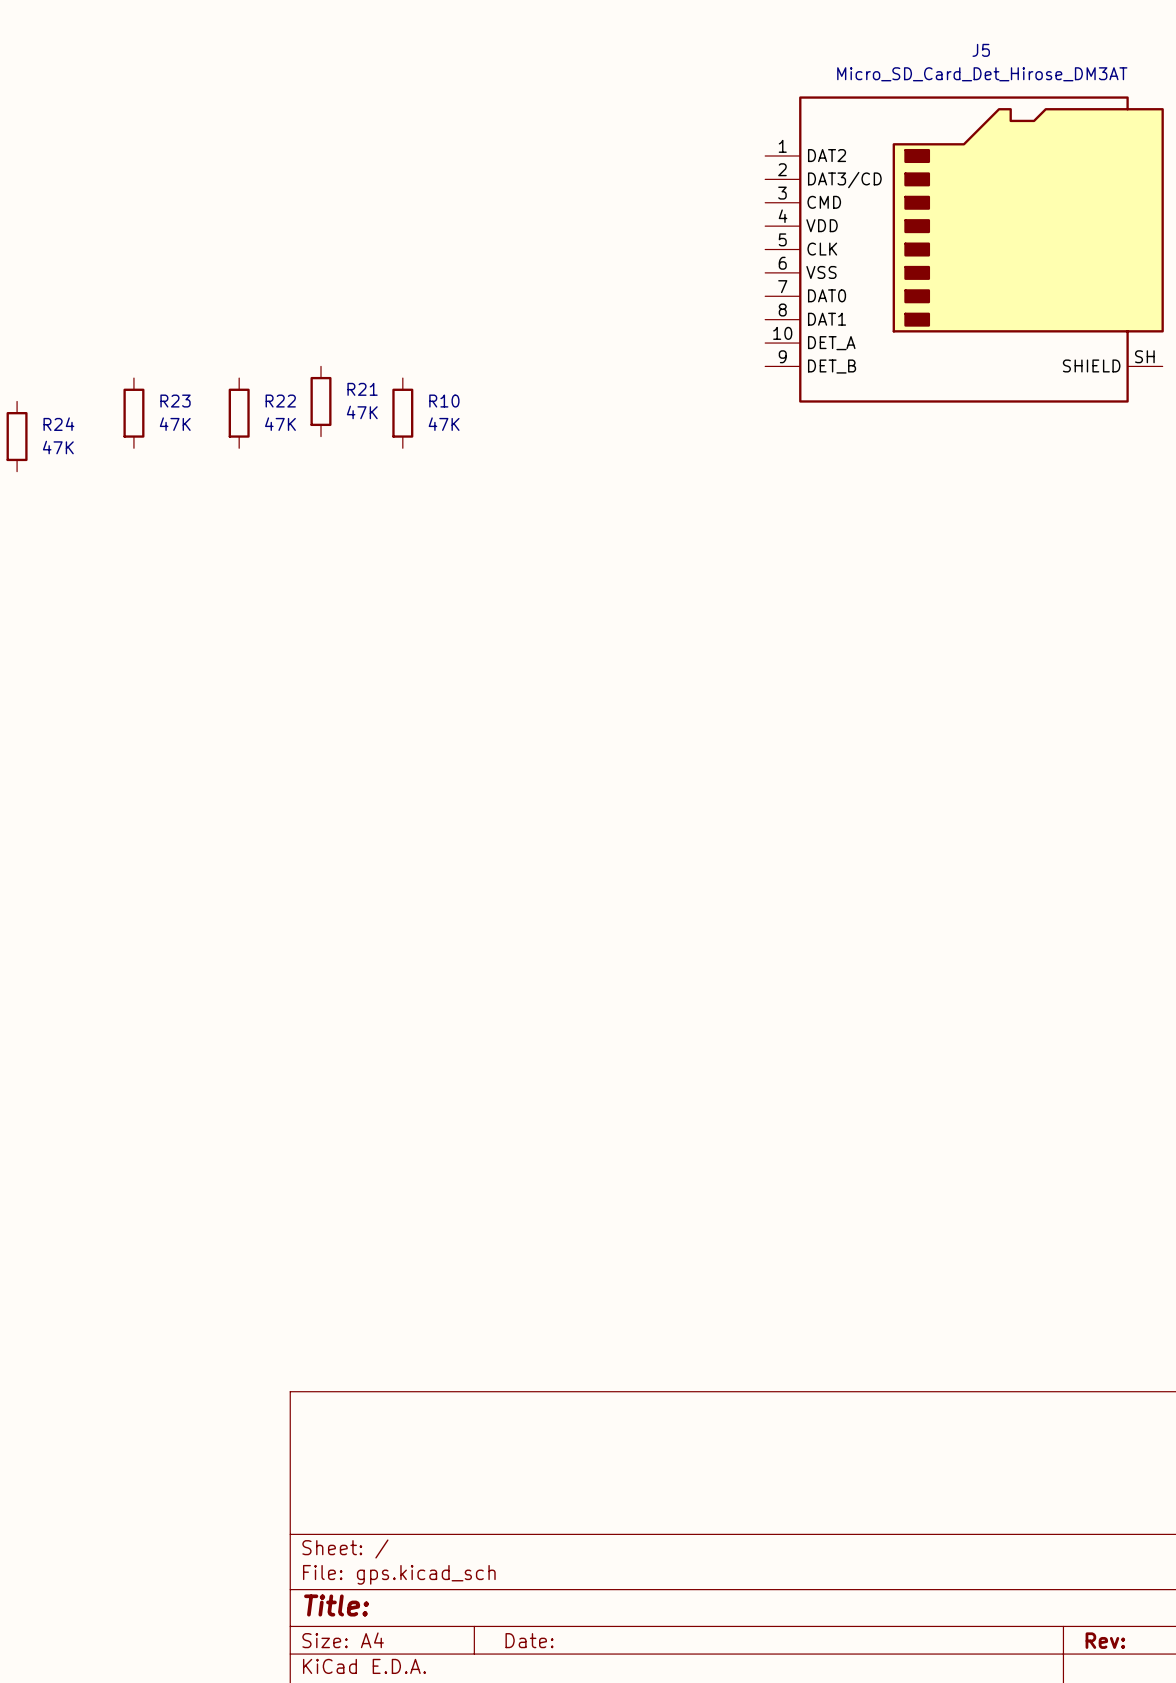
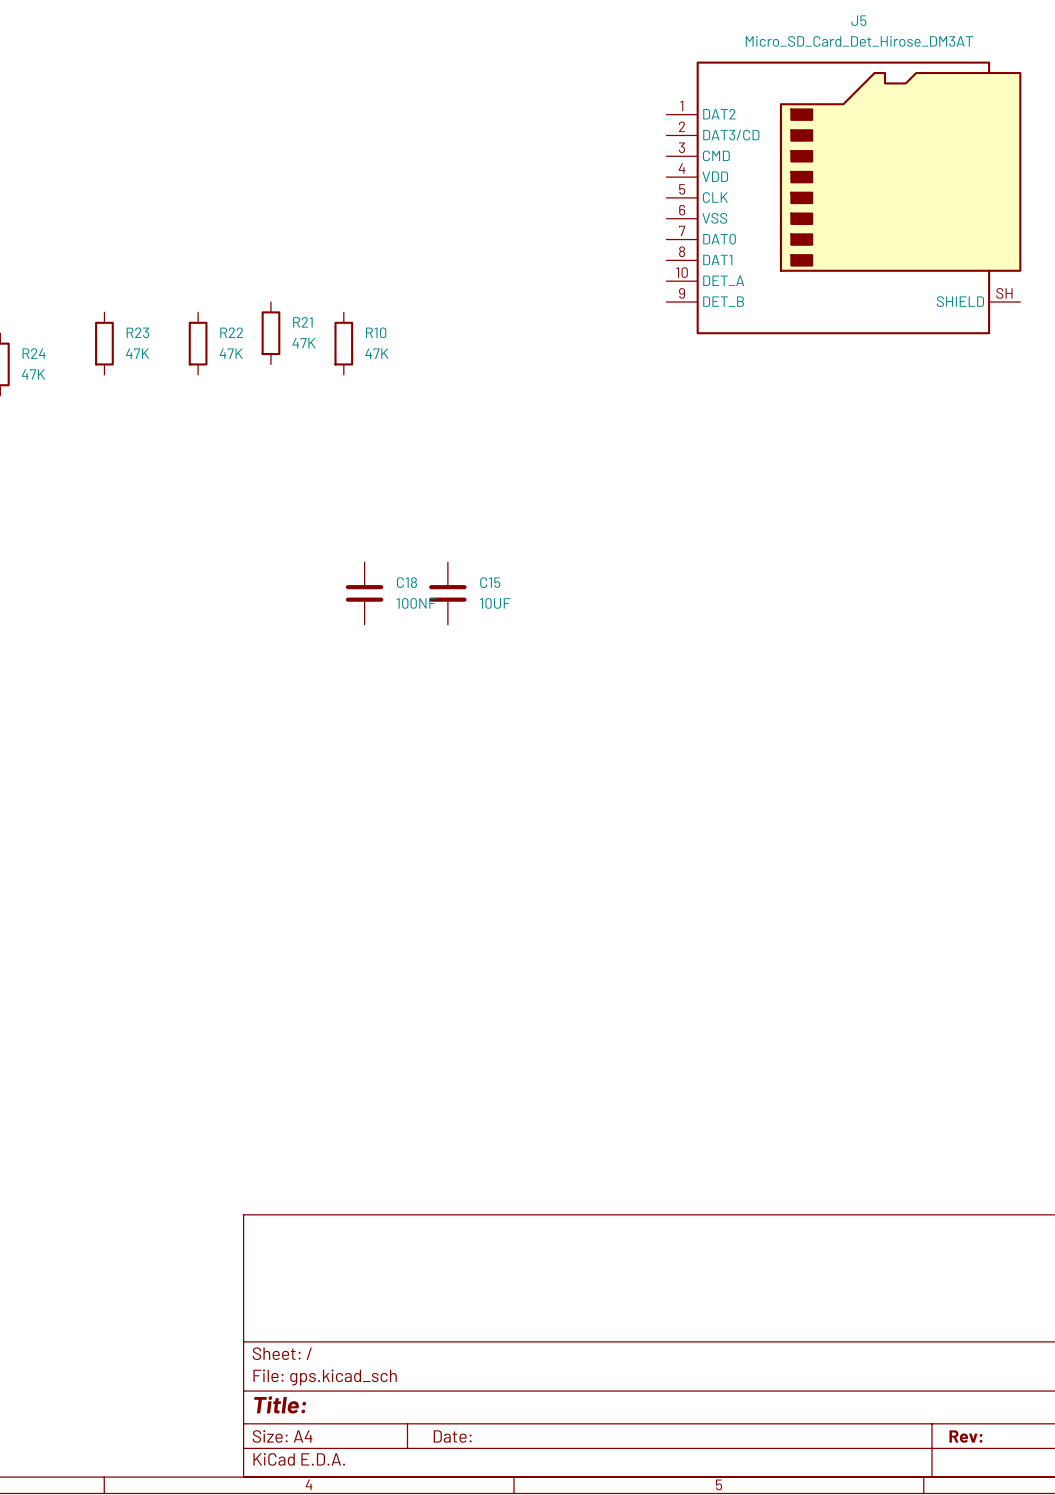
C18: none -> 100NF (364, 593)
C15: none -> 10UF (447, 593)

